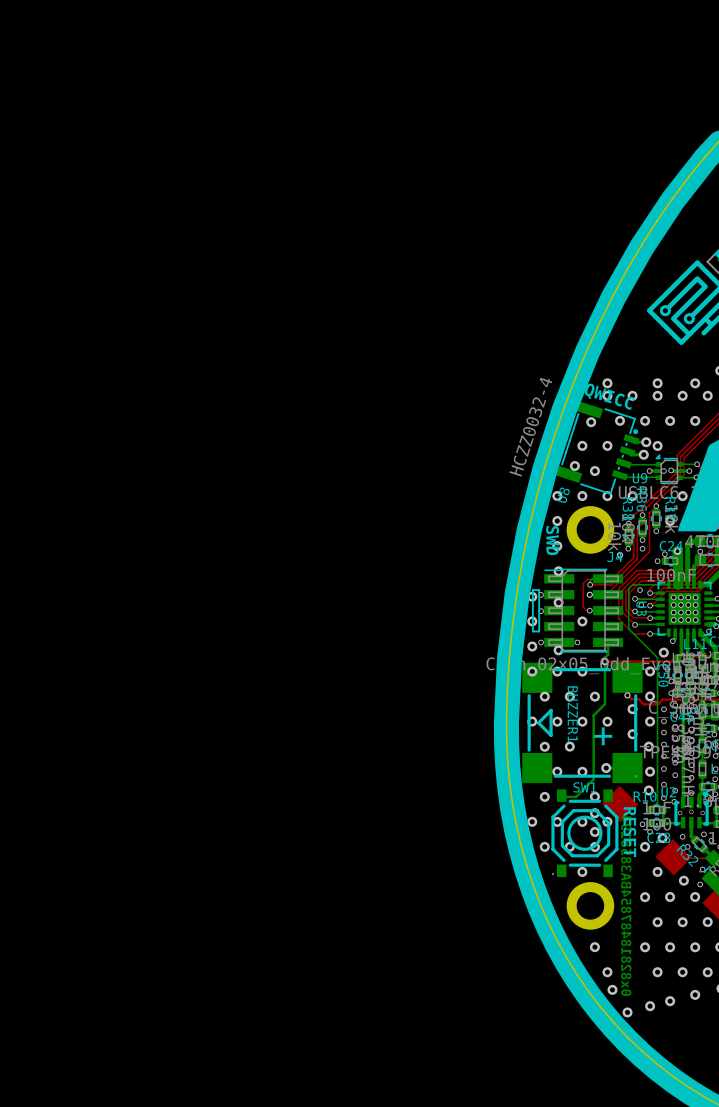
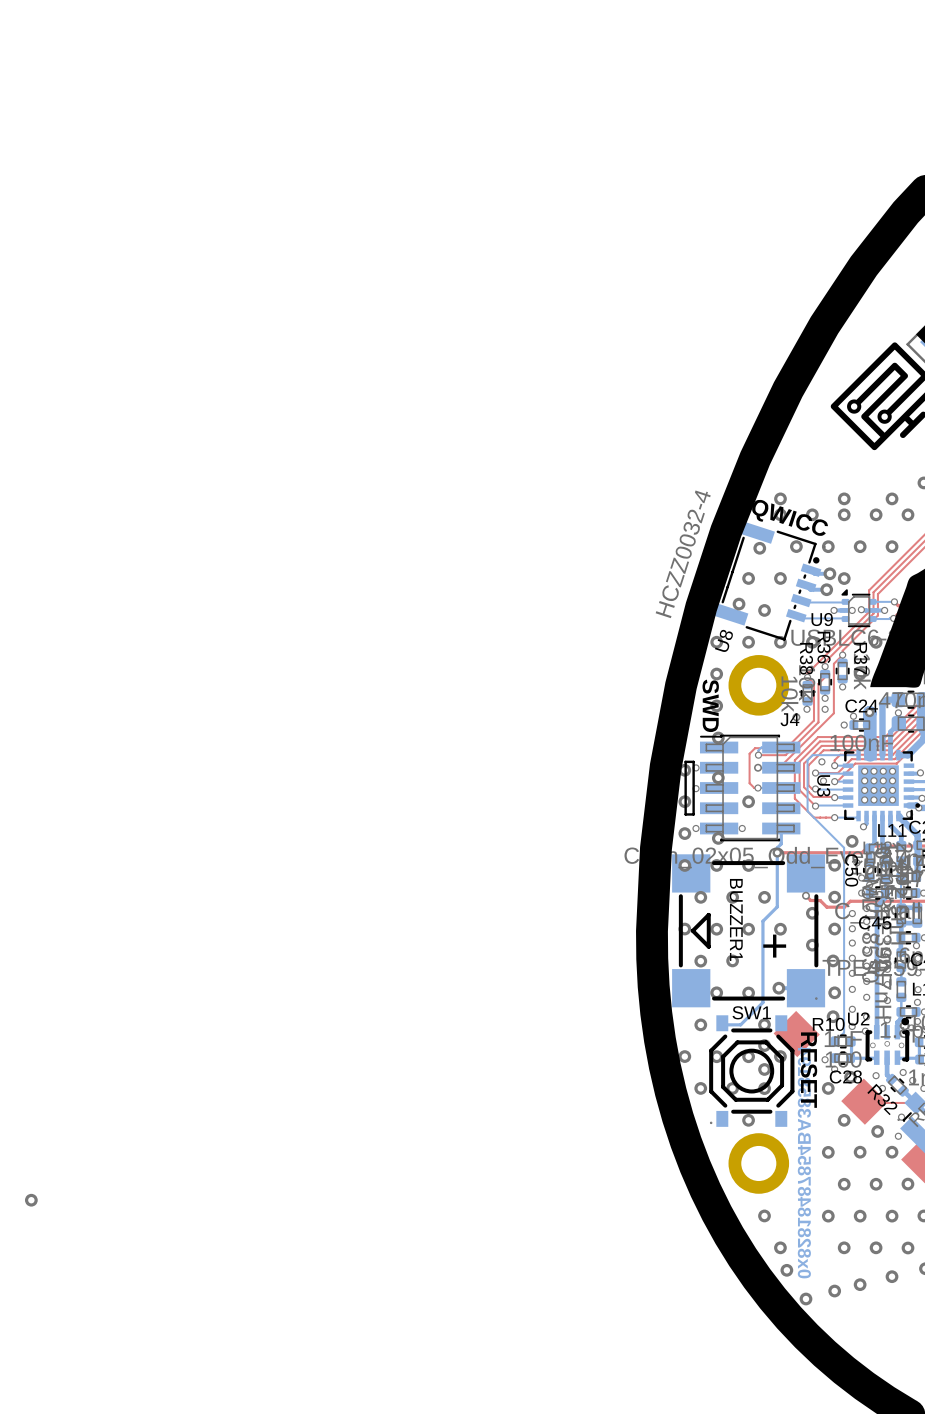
via: none -> (31, 1200)

